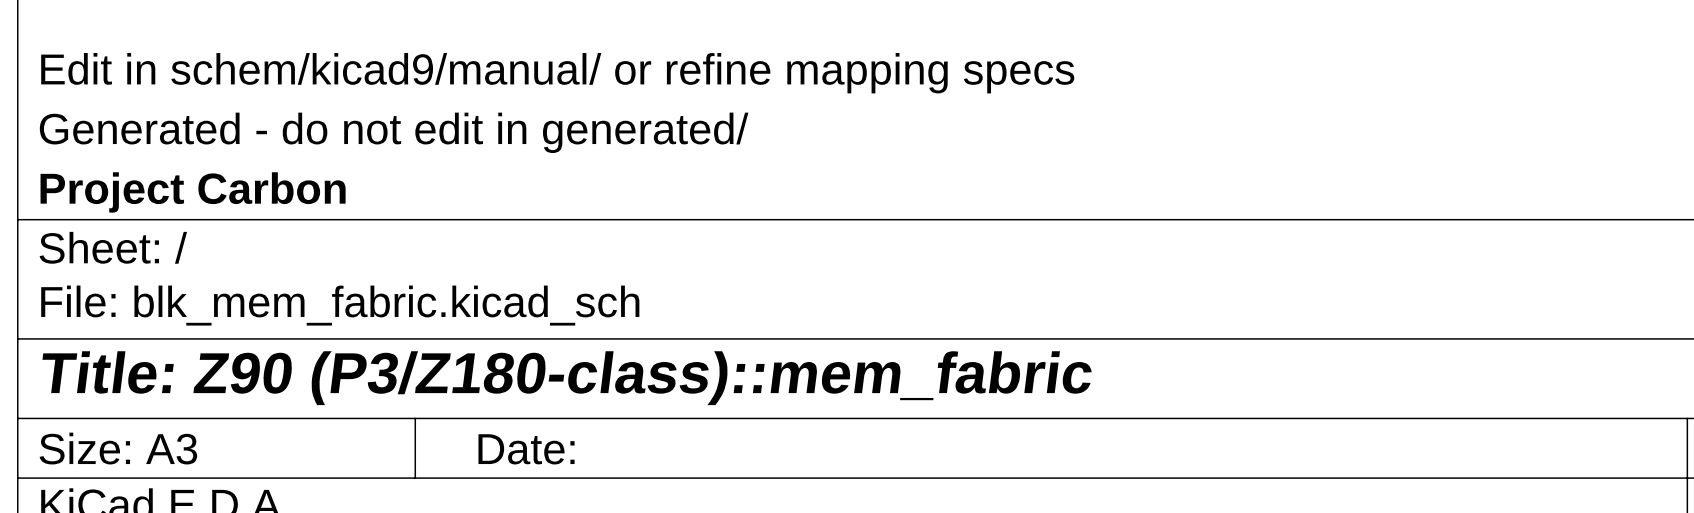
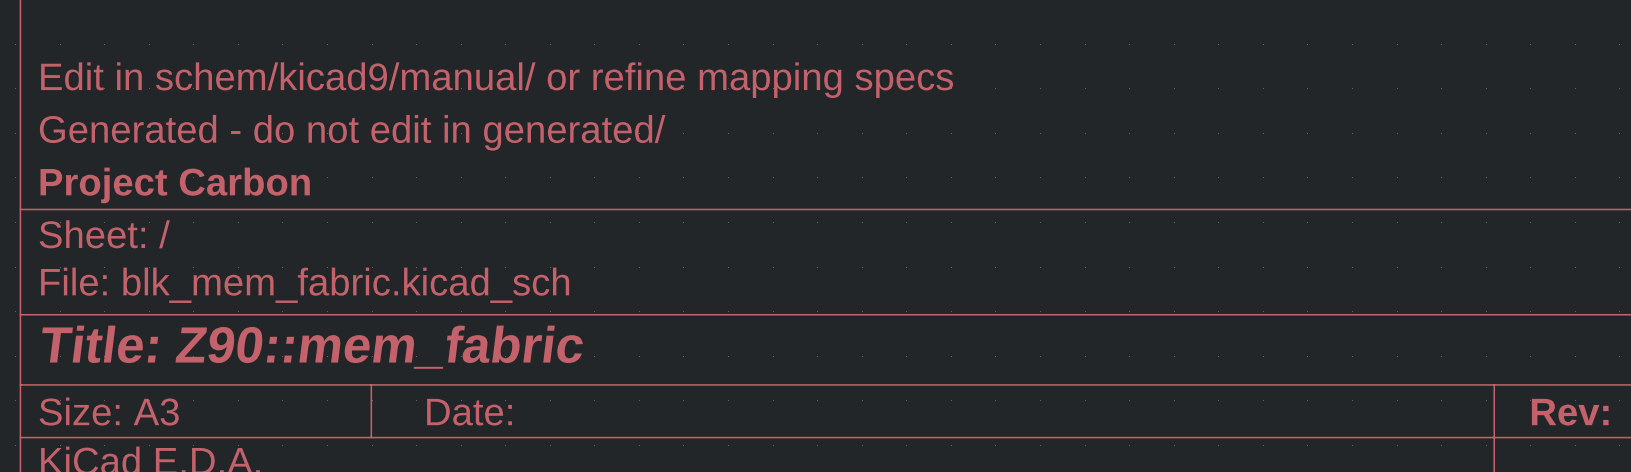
title block: Title: Z90 (P3/Z180-class)::mem_fabric (567, 378) -> Title: Z90::mem_fabric (312, 347)

